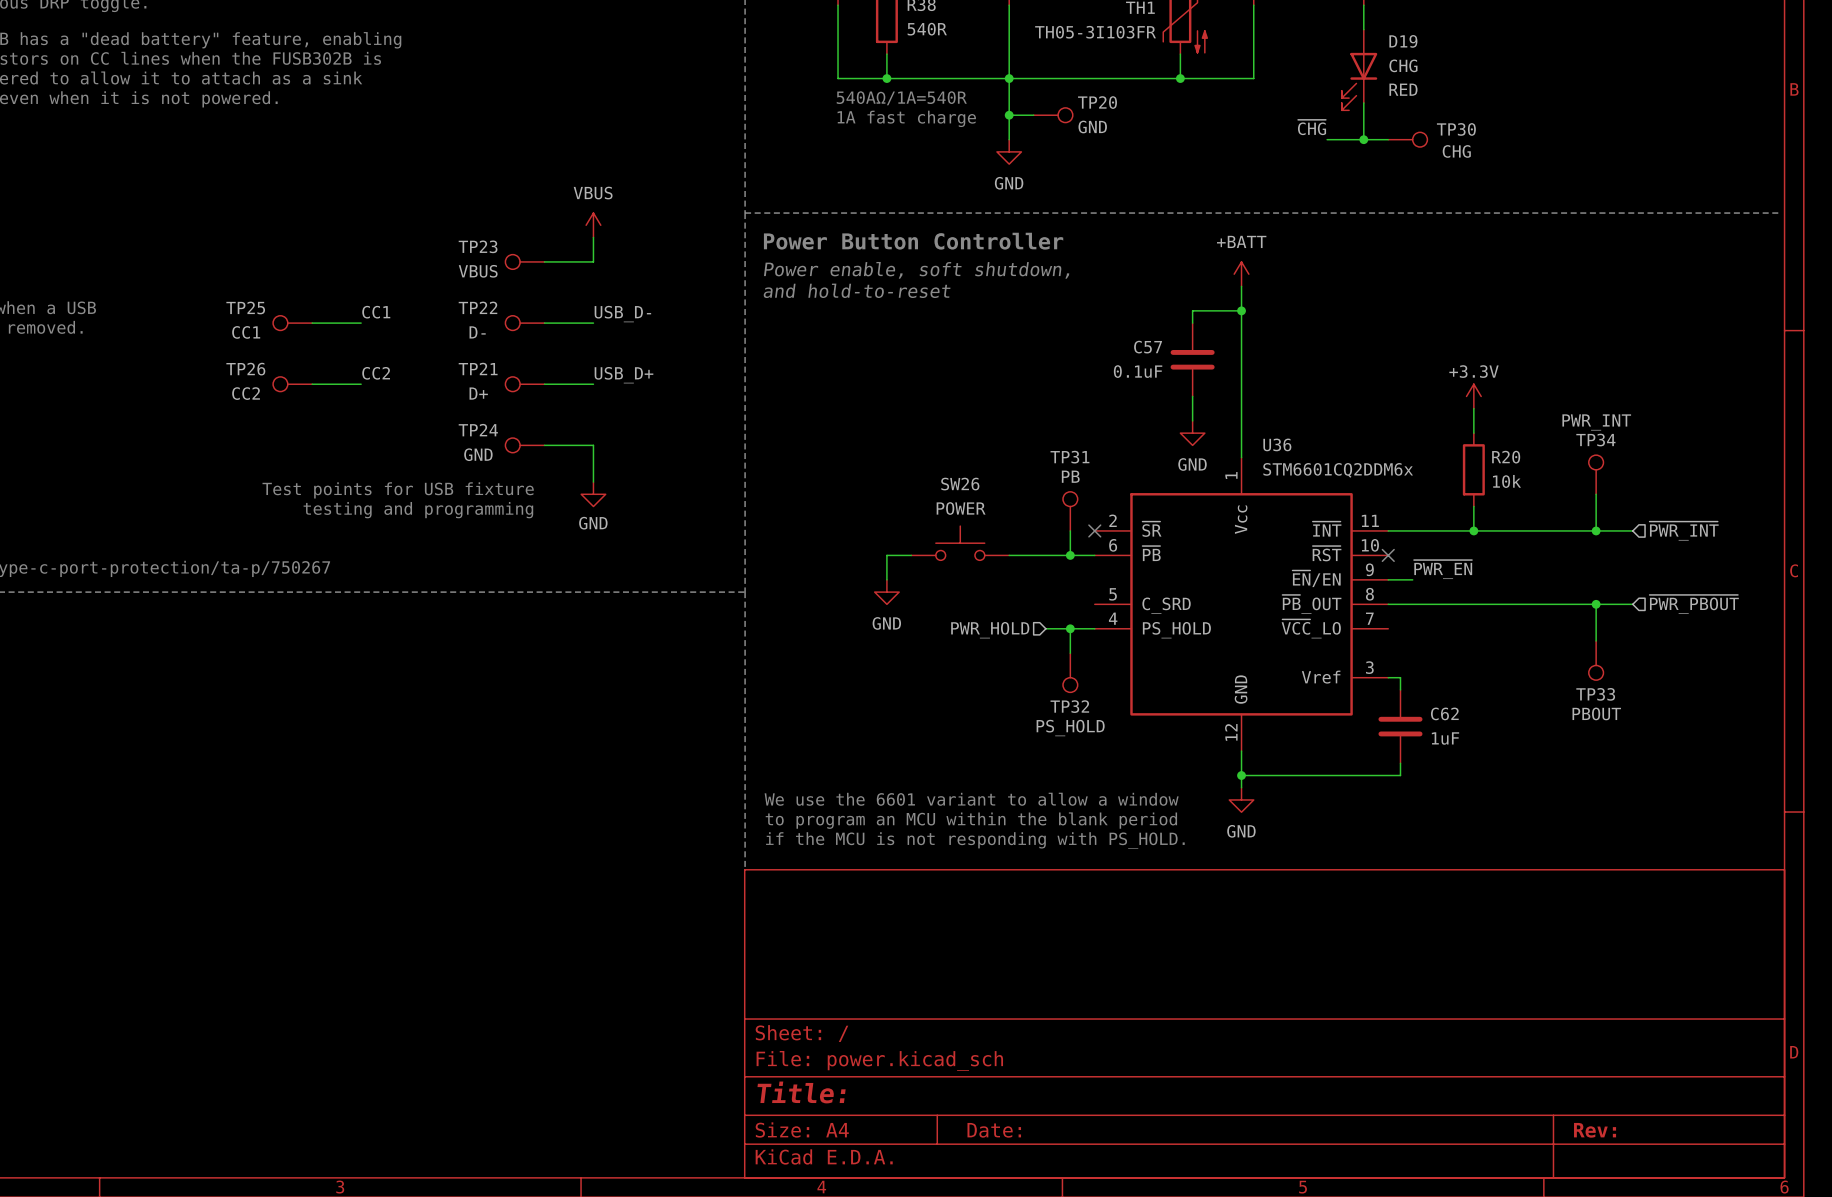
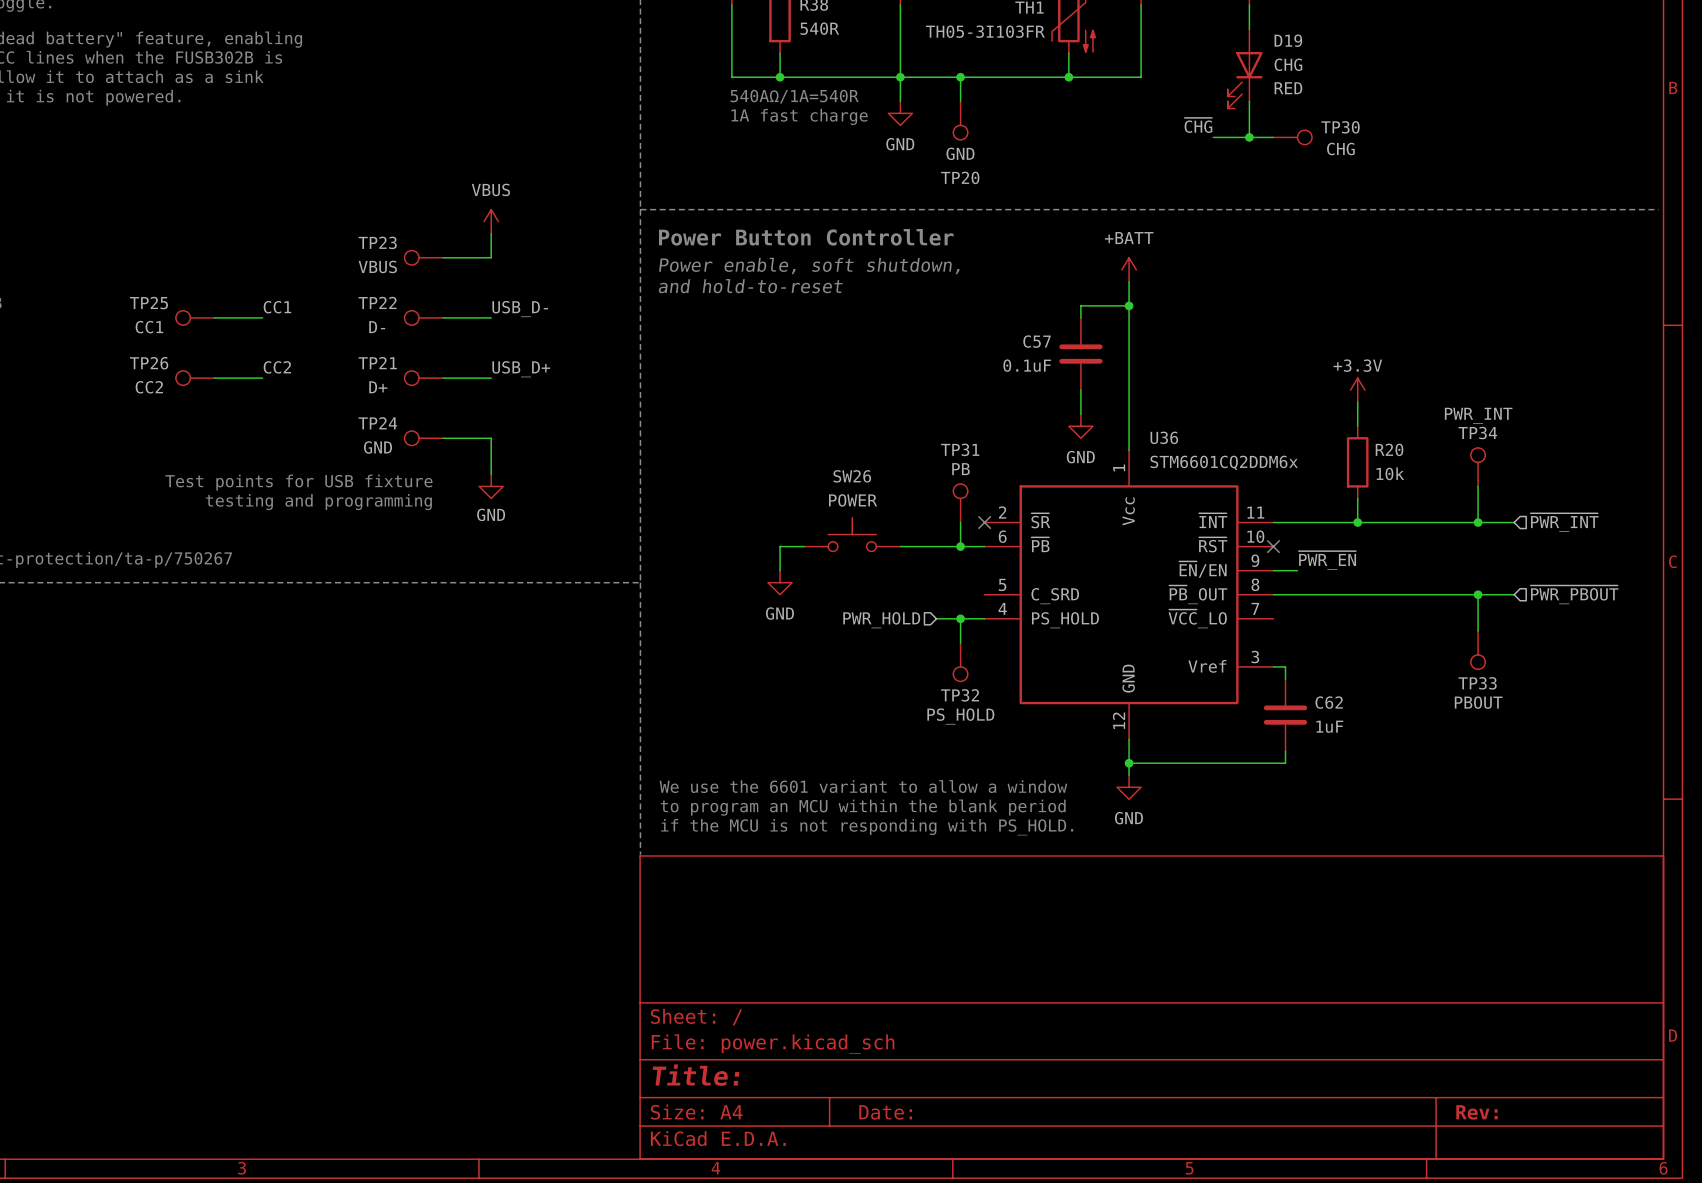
wire: none -> (960, 77) (960, 101)
junction: none -> (960, 77)
wire: (1009, 102) (1009, 139) -> none
wire: (1009, 115) (1033, 115) -> none
junction: (1009, 115) -> none
TP20 rotation: 0° (1065, 115) -> 90° clockwise (960, 132)
power symbol position: GND (1009, 151) -> GND (900, 113)

